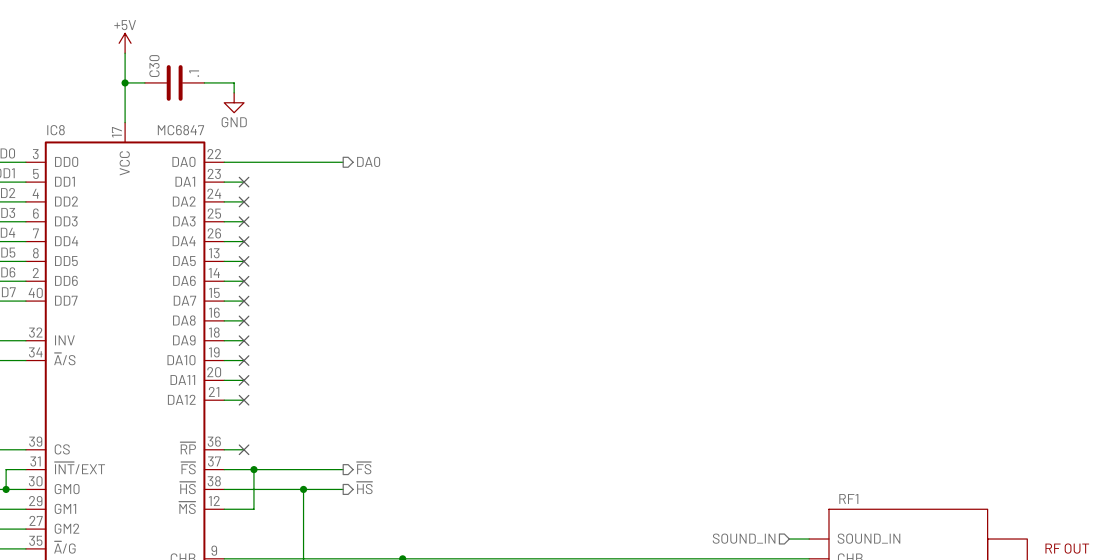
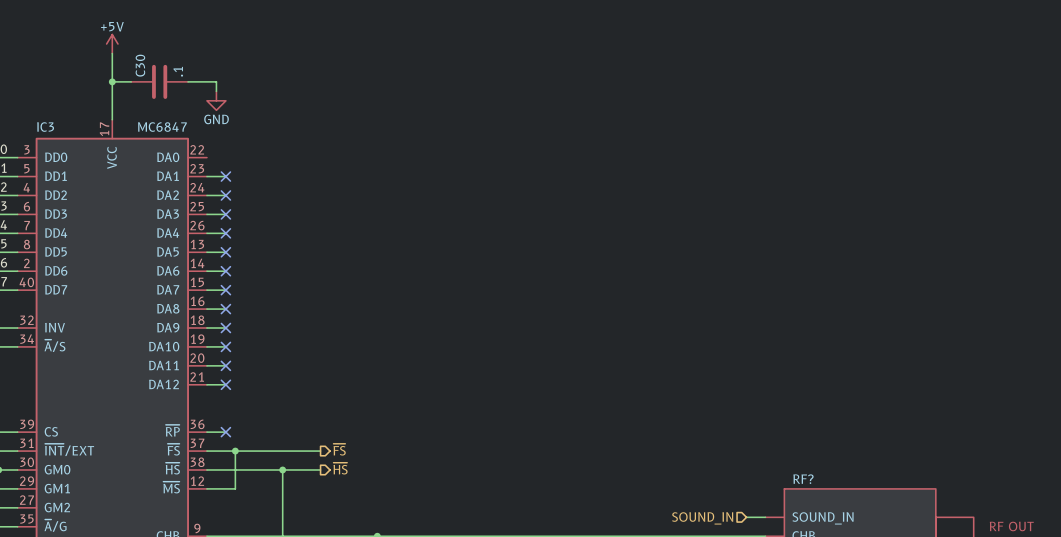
IC8 name: IC8 (56, 130) -> IC3 (45, 127)
hierarchical label: DA0 (368, 161) -> none
wire: (224, 162) (343, 162) -> none
RF1 name: RF1 (848, 498) -> RF? (803, 479)

